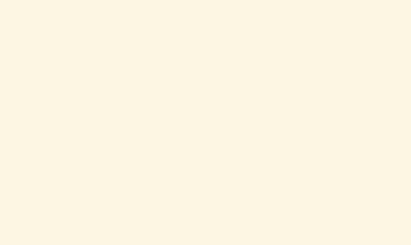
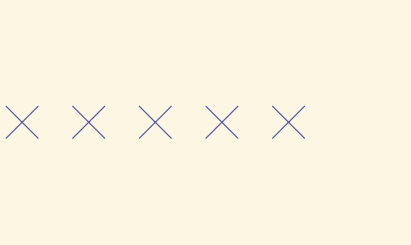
no-connect mark: none -> (22, 122)
no-connect mark: none -> (88, 122)
no-connect mark: none -> (155, 122)
no-connect mark: none -> (221, 122)
no-connect mark: none -> (288, 122)

